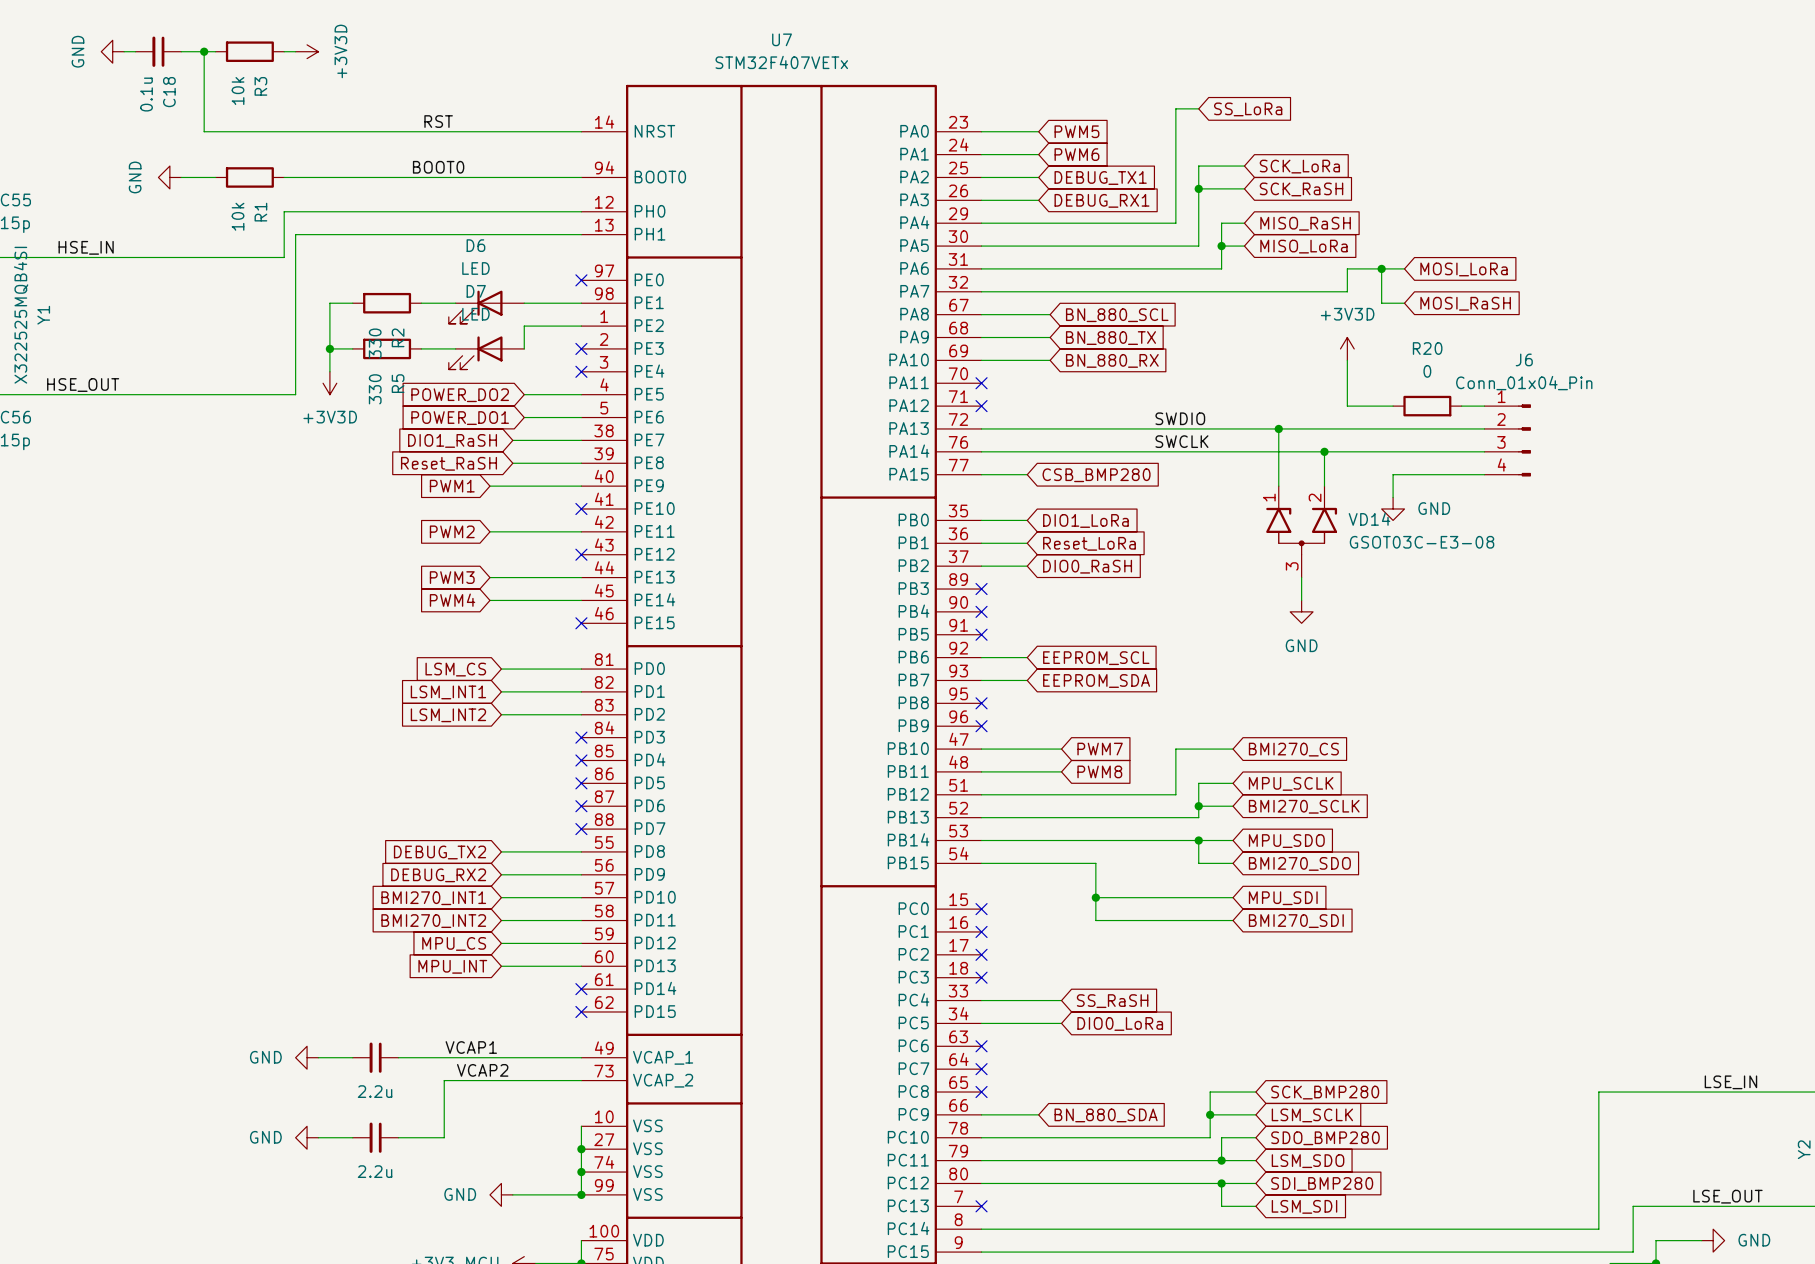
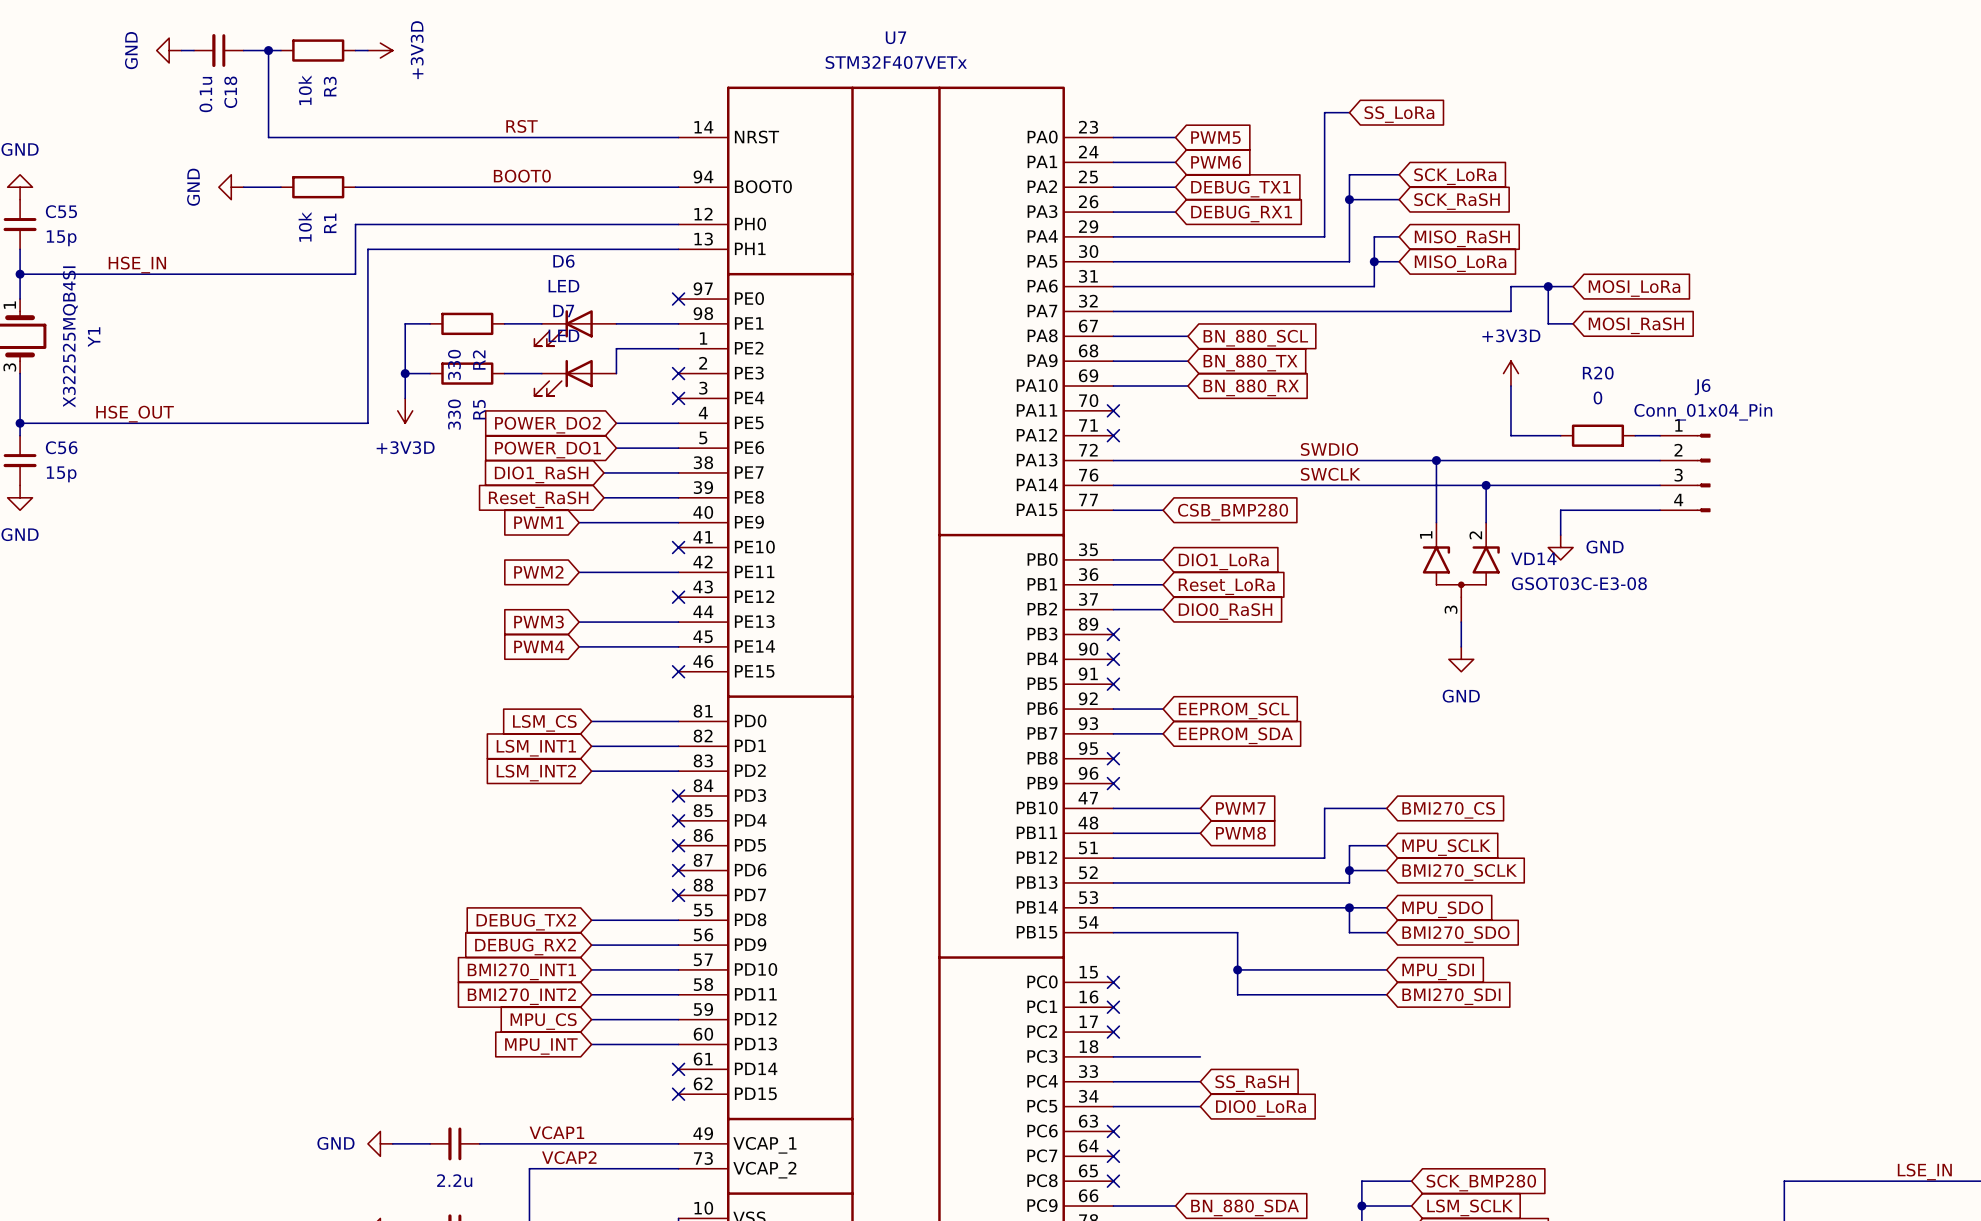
wire: none -> (1113, 1056) (1200, 1056)
no-connect mark: (981, 977) -> none

